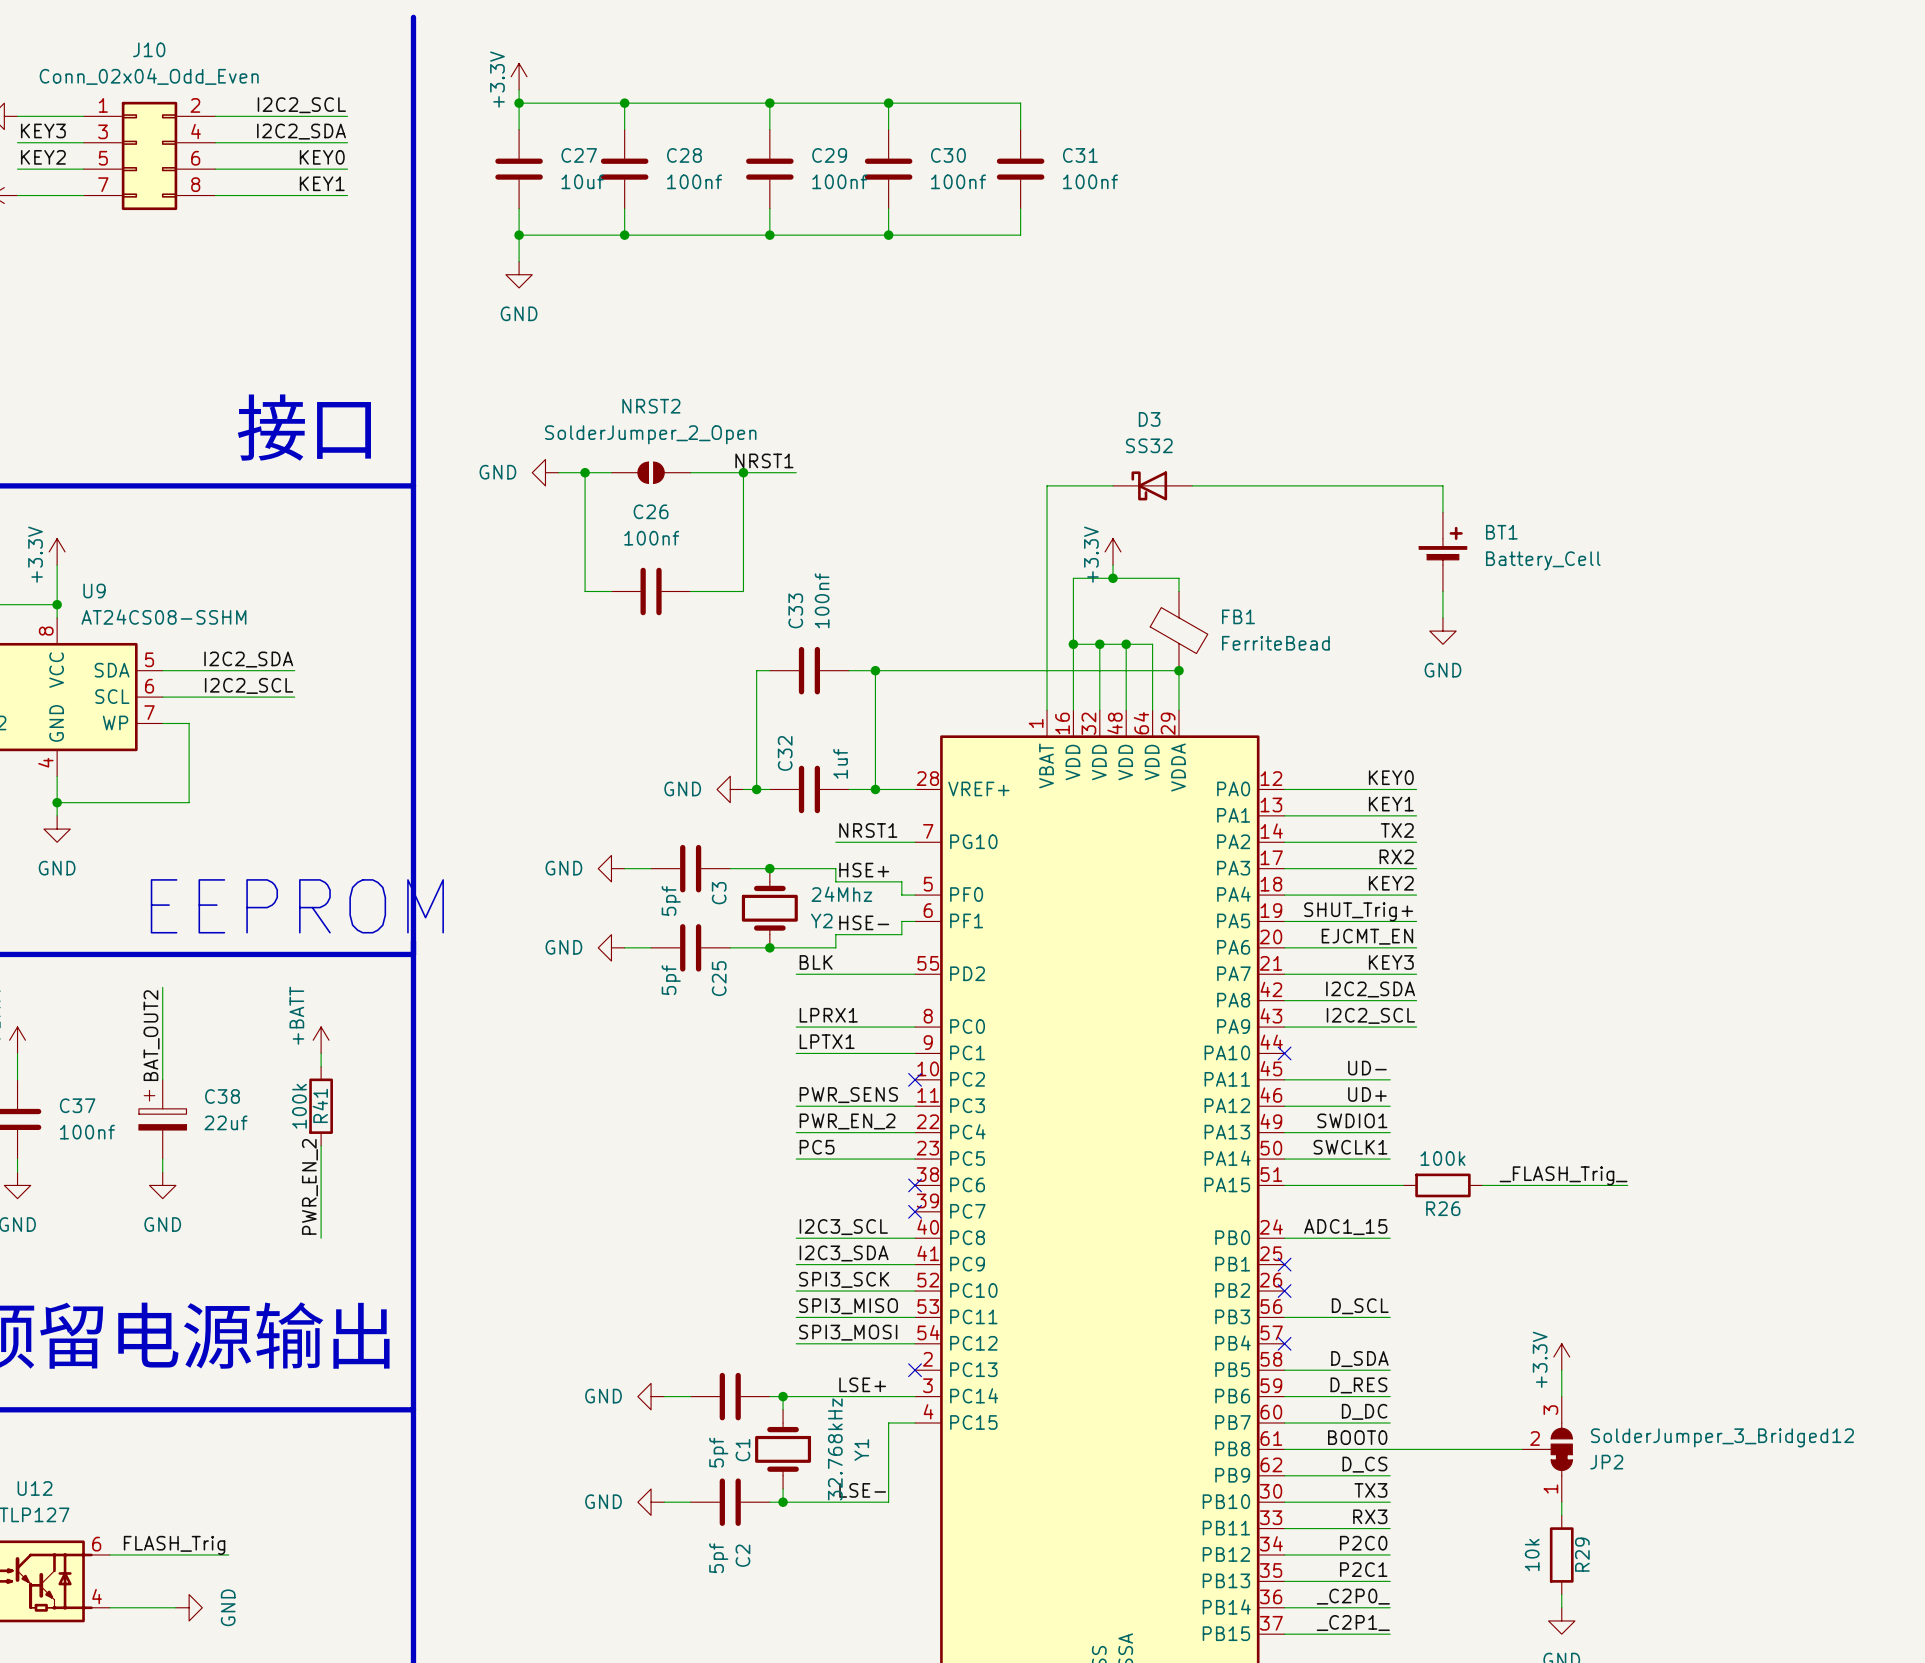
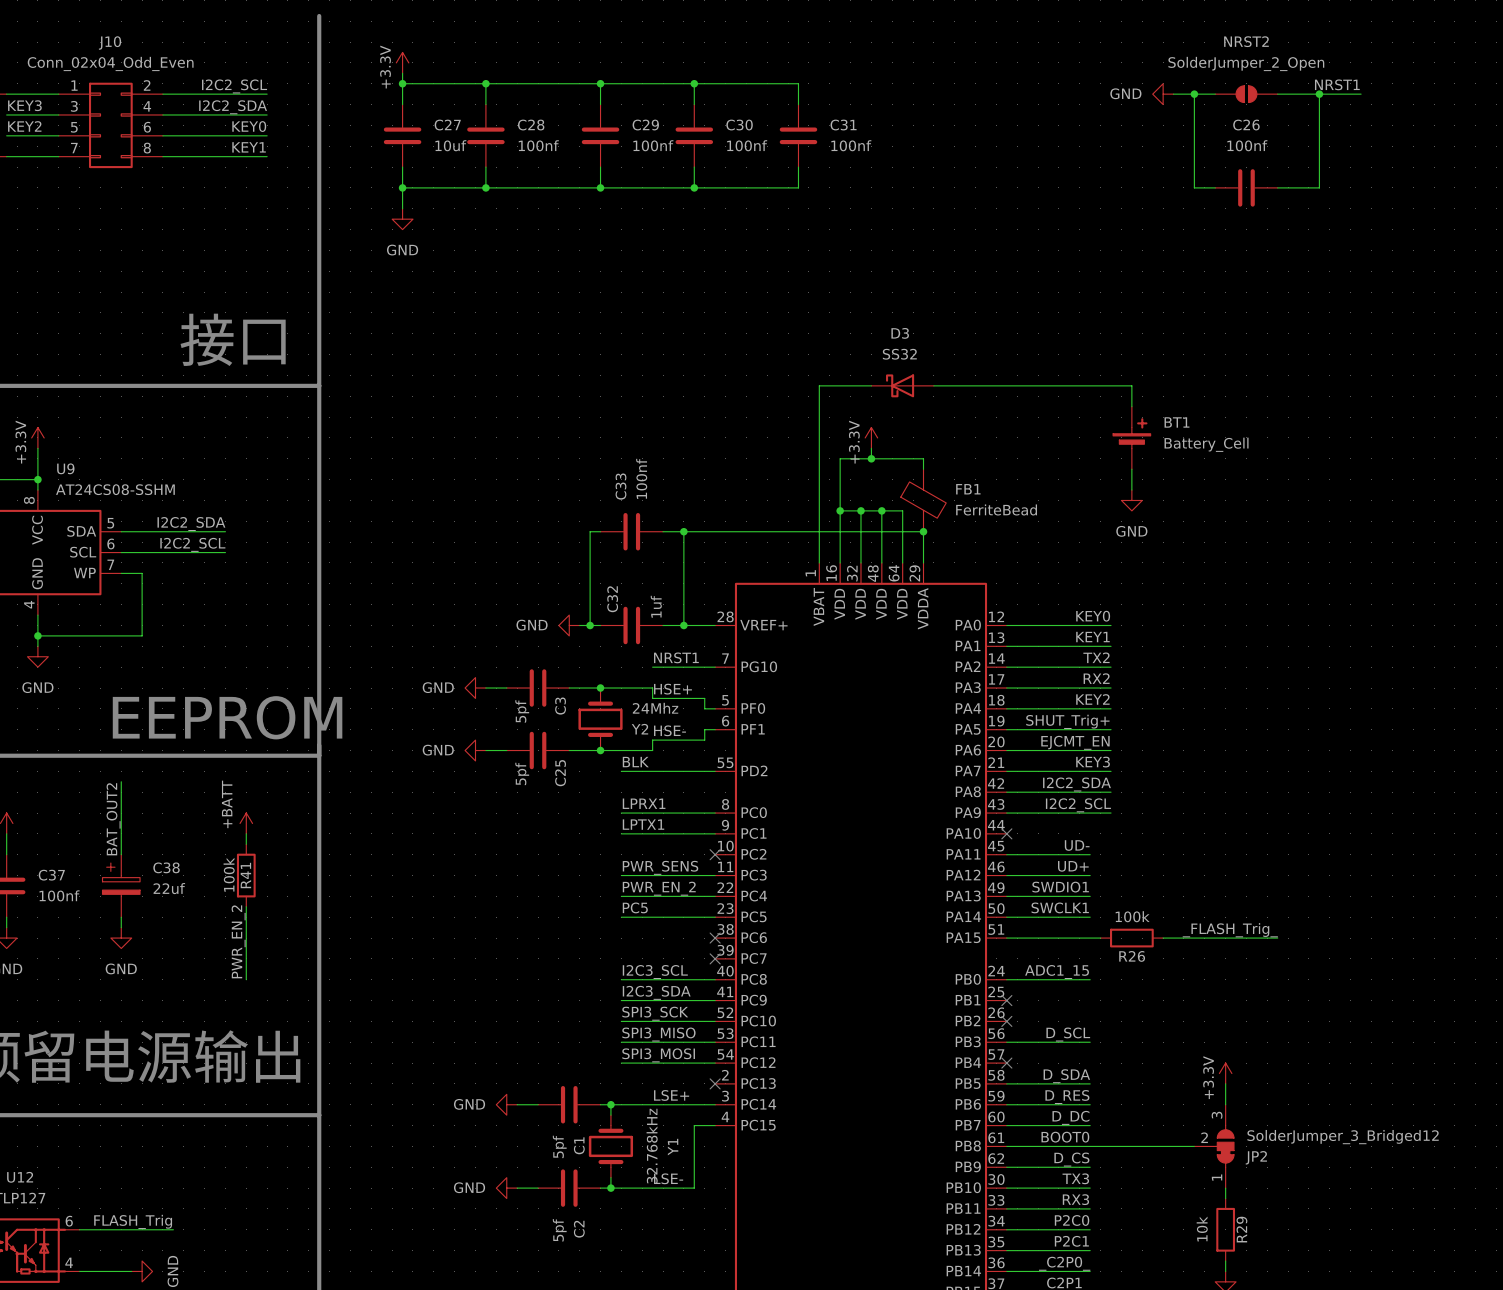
label: none -> NRST1 (1337, 84)
power symbol: none -> GND (1163, 94)
wire: none -> (1173, 94) (1215, 94)
wire: none -> (1194, 94) (1194, 187) (1215, 187)
junction: none -> (1194, 94)
wire: none -> (1277, 94) (1361, 94)
wire: none -> (1319, 94) (1319, 187) (1277, 187)
junction: none -> (1319, 94)
label: NRST1 (764, 460) -> none
power symbol: GND (545, 472) -> none
wire: (558, 472) (611, 472) -> none
wire: (585, 472) (585, 591) (611, 591) -> none
junction: (585, 472) -> none
NRST2 position: (651, 472) -> (1246, 94)
wire: (690, 472) (796, 472) -> none
wire: (743, 472) (743, 591) (690, 591) -> none
junction: (743, 472) -> none
C26 position: (651, 591) -> (1246, 187)

